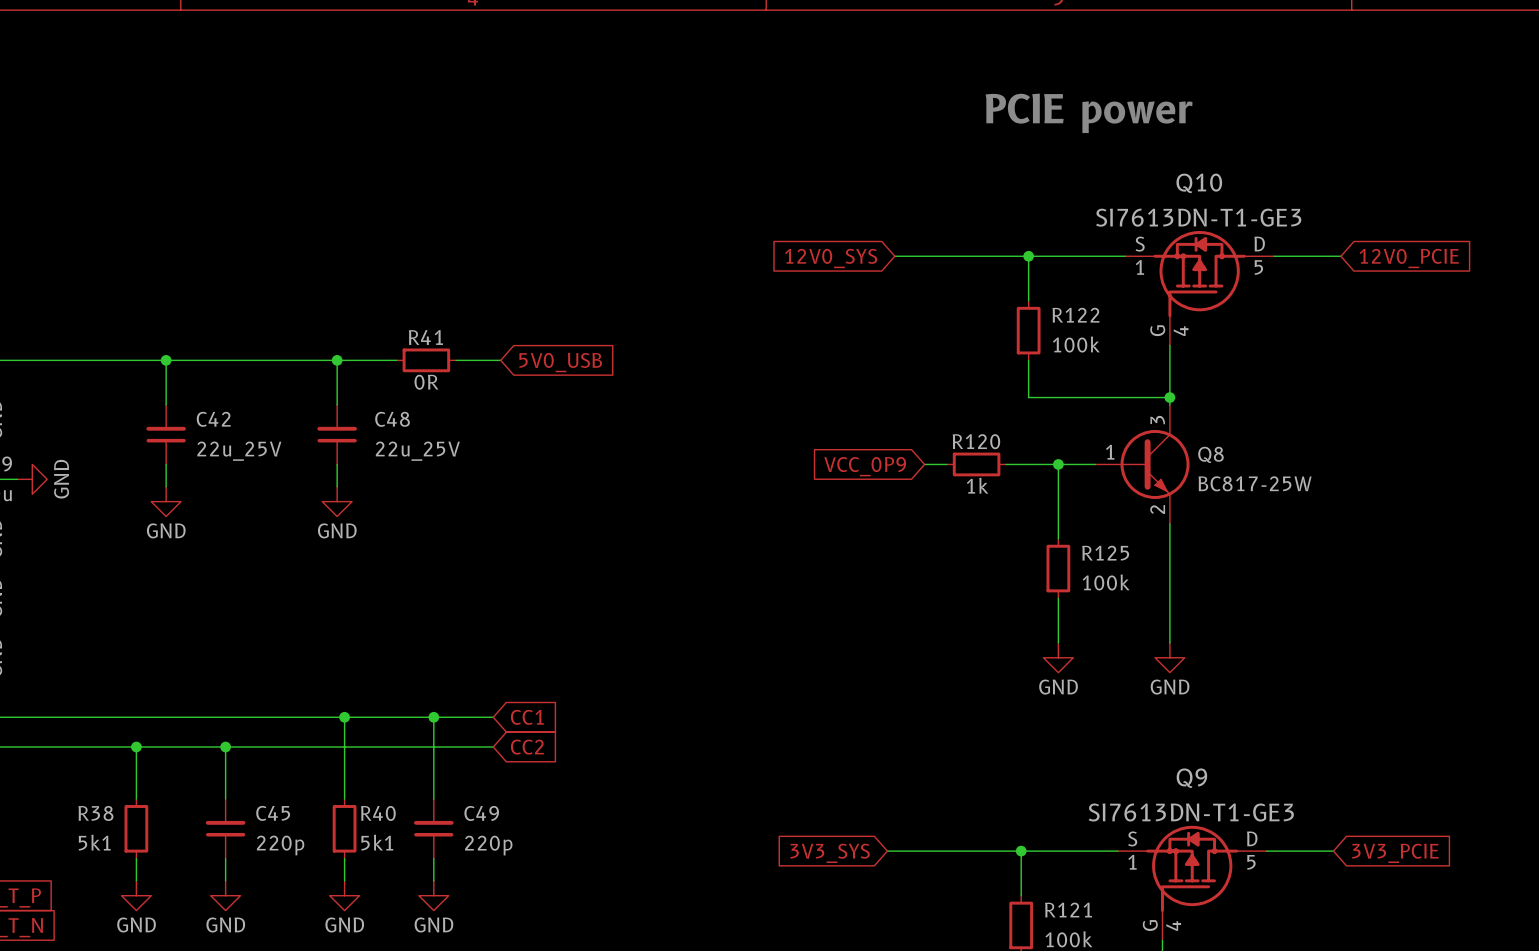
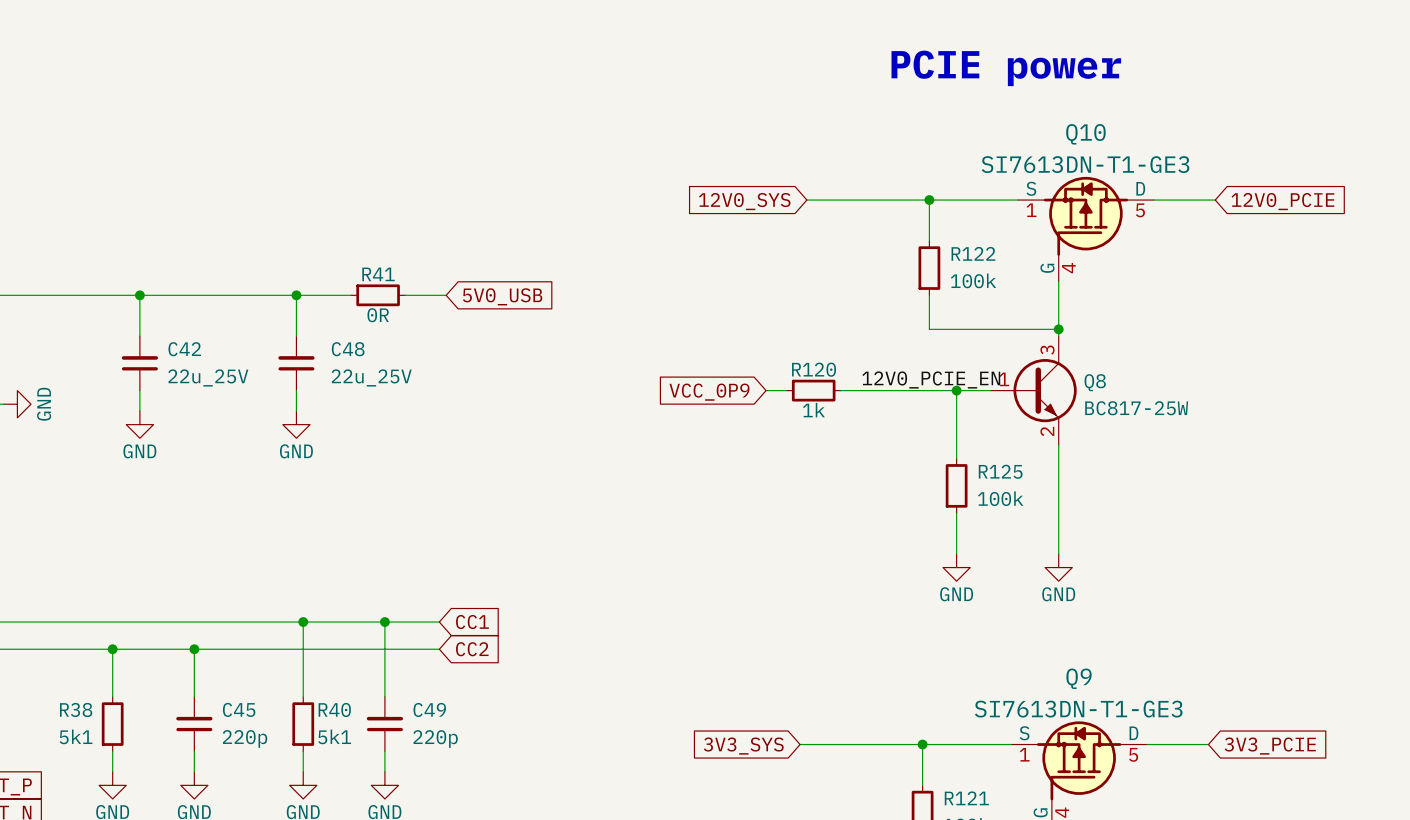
label: none -> 12V0_PCIE_EN (931, 379)
wire: none -> (766, 390) (786, 390)
wire: none -> (854, 390) (908, 390)
R120 position: (976, 464) -> (813, 390)
global label position: VCC_0P9 (865, 466) -> VCC_0P9 (709, 392)

